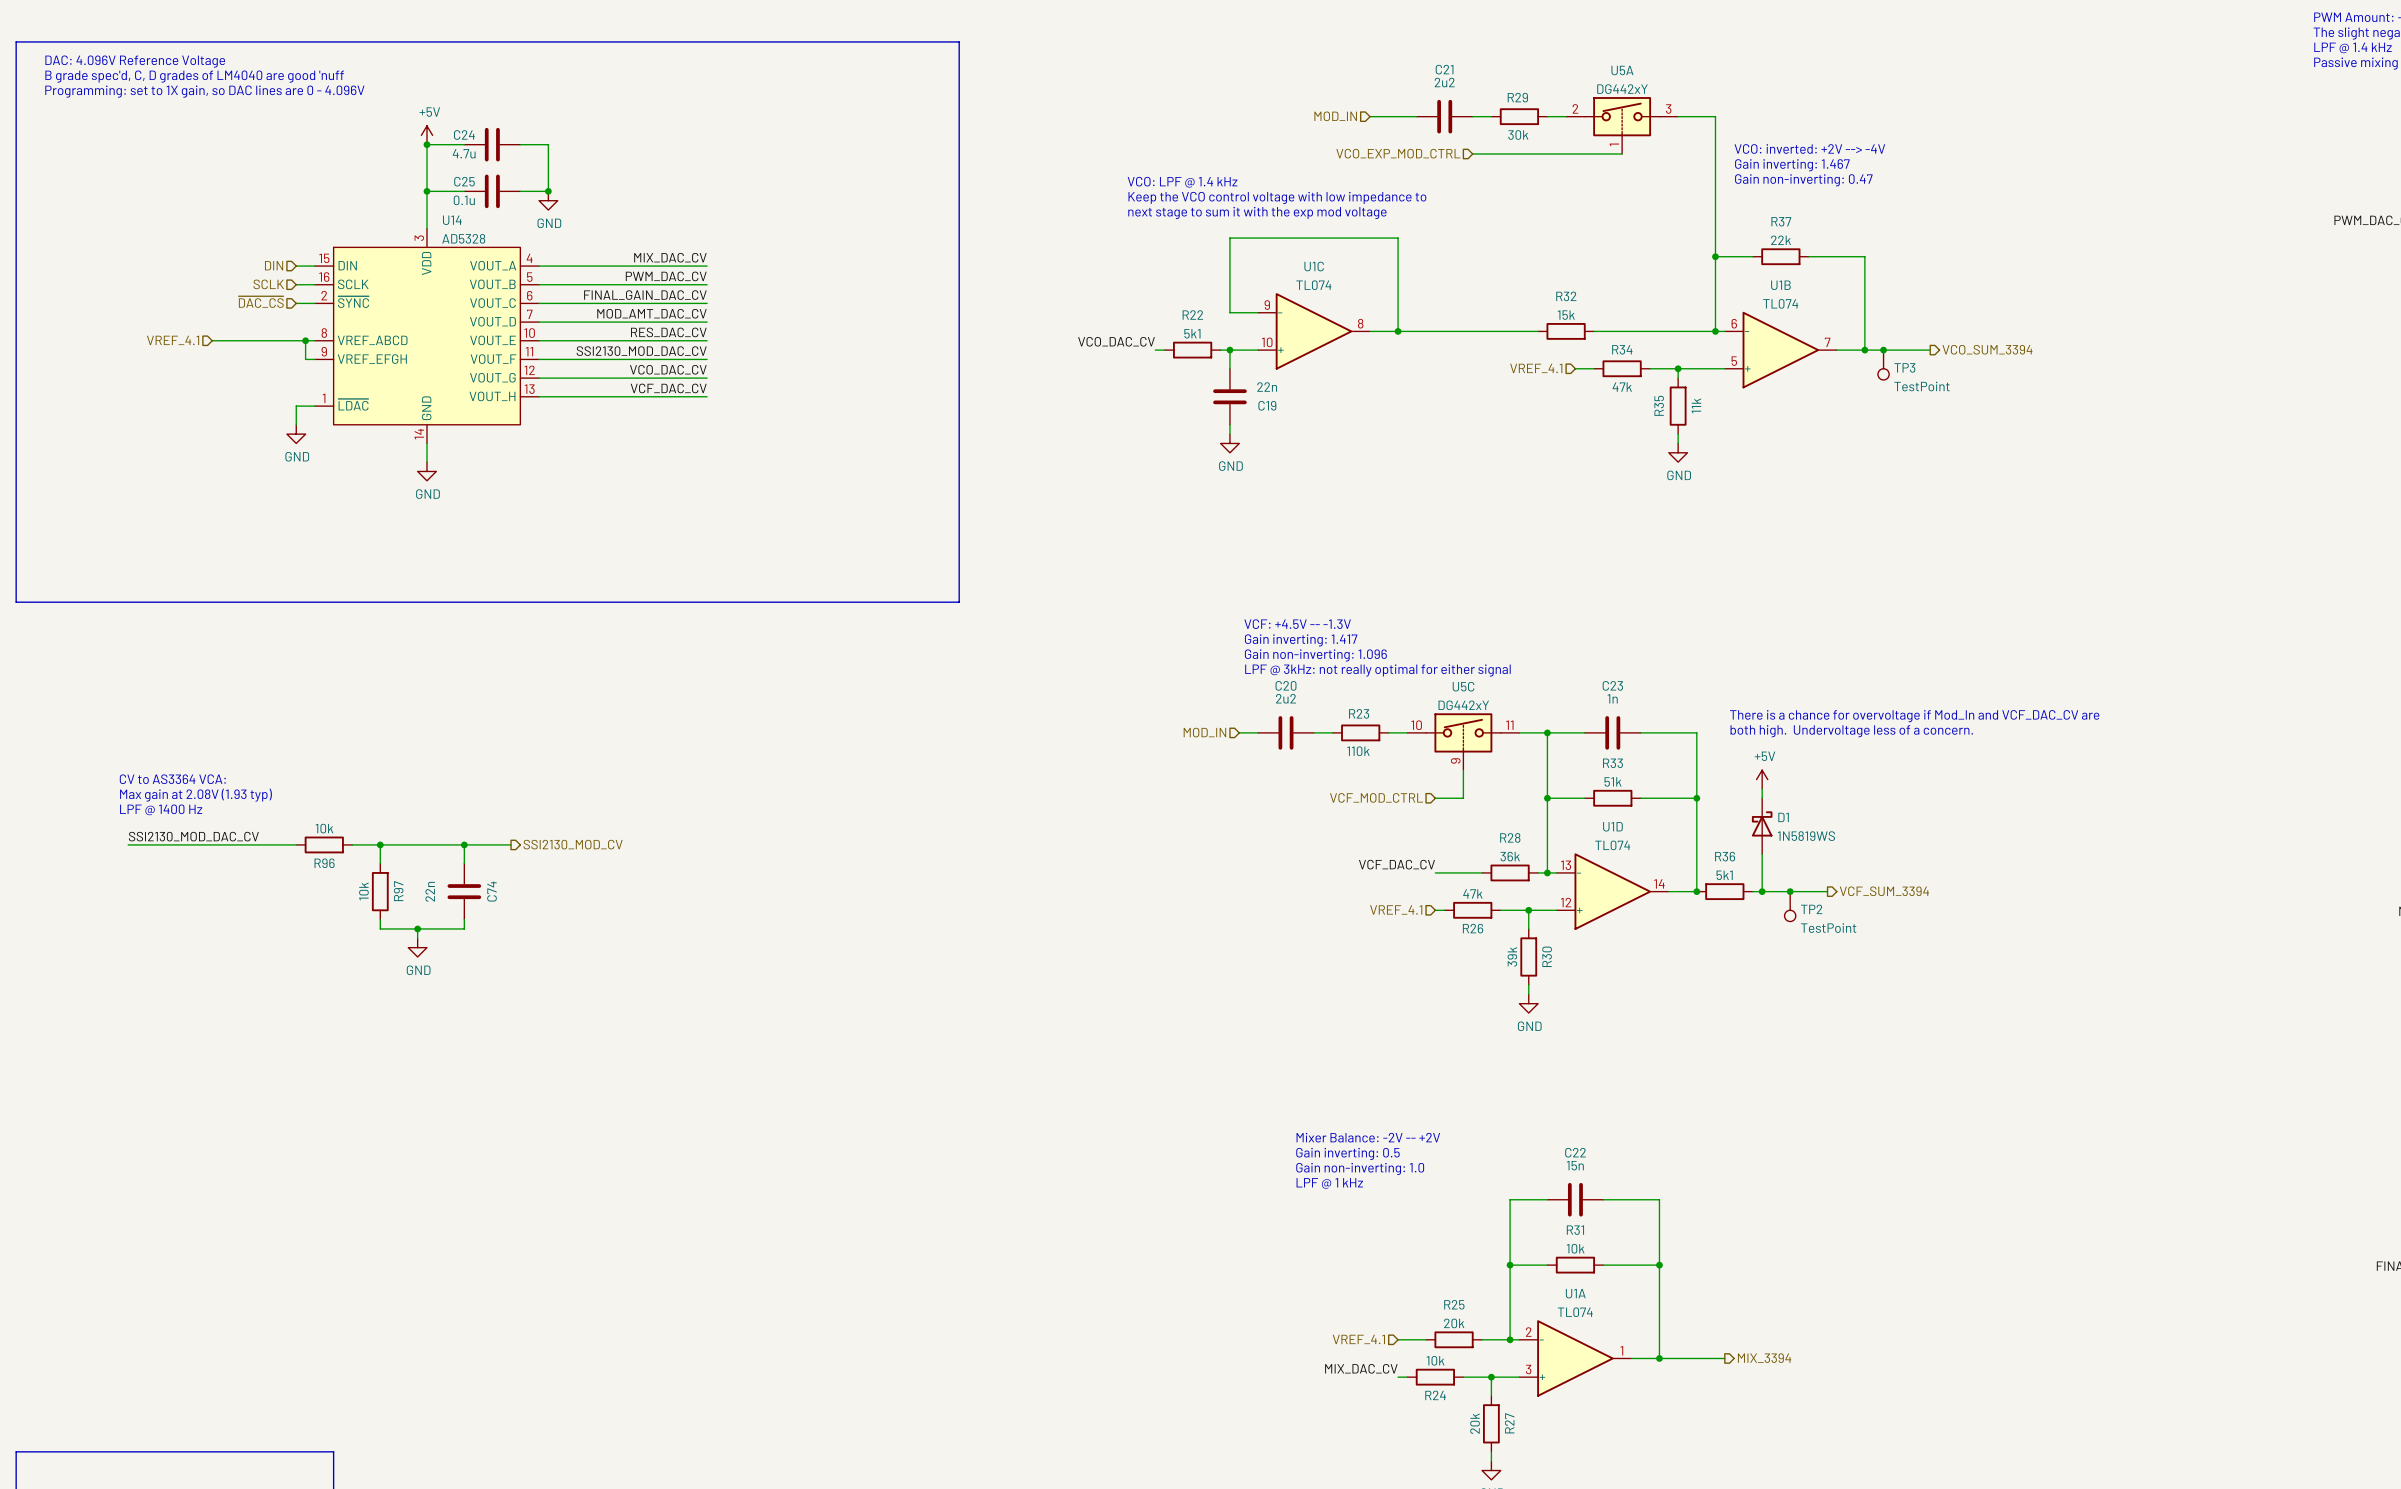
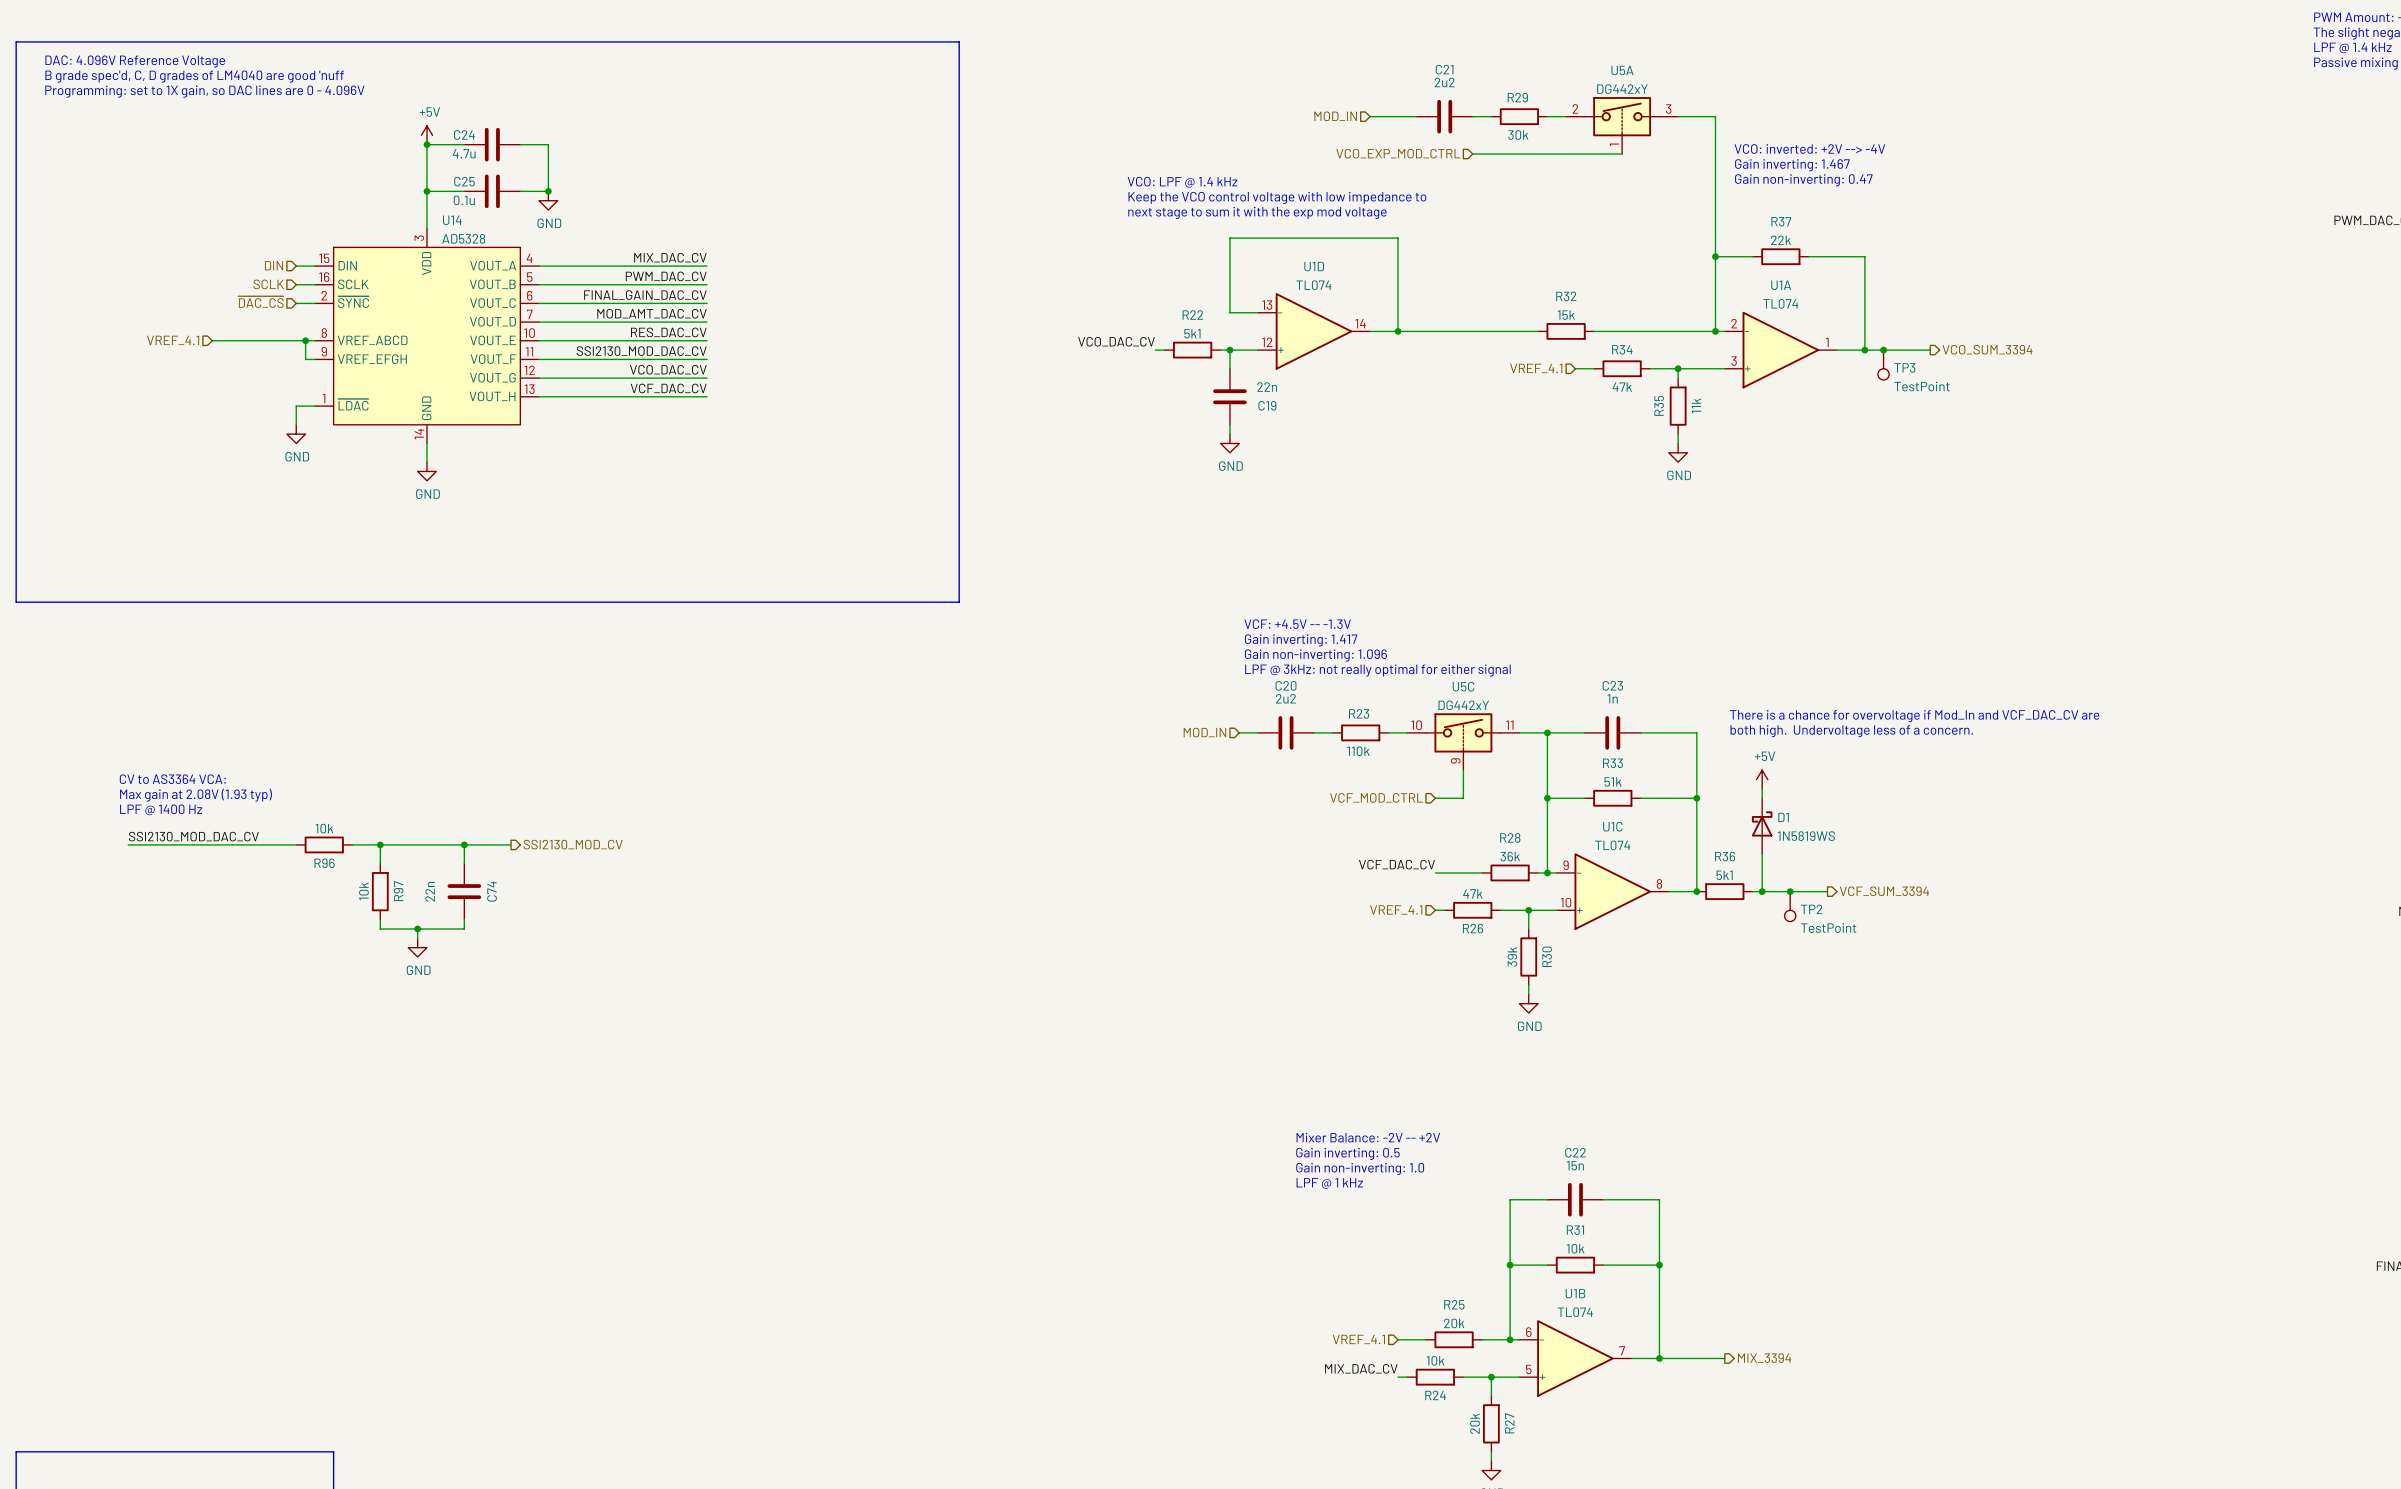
U1C position: (1314, 331) -> (1612, 891)
U1B position: (1780, 350) -> (1575, 1358)
U1D position: (1612, 891) -> (1314, 331)
U1A position: (1575, 1358) -> (1780, 350)

